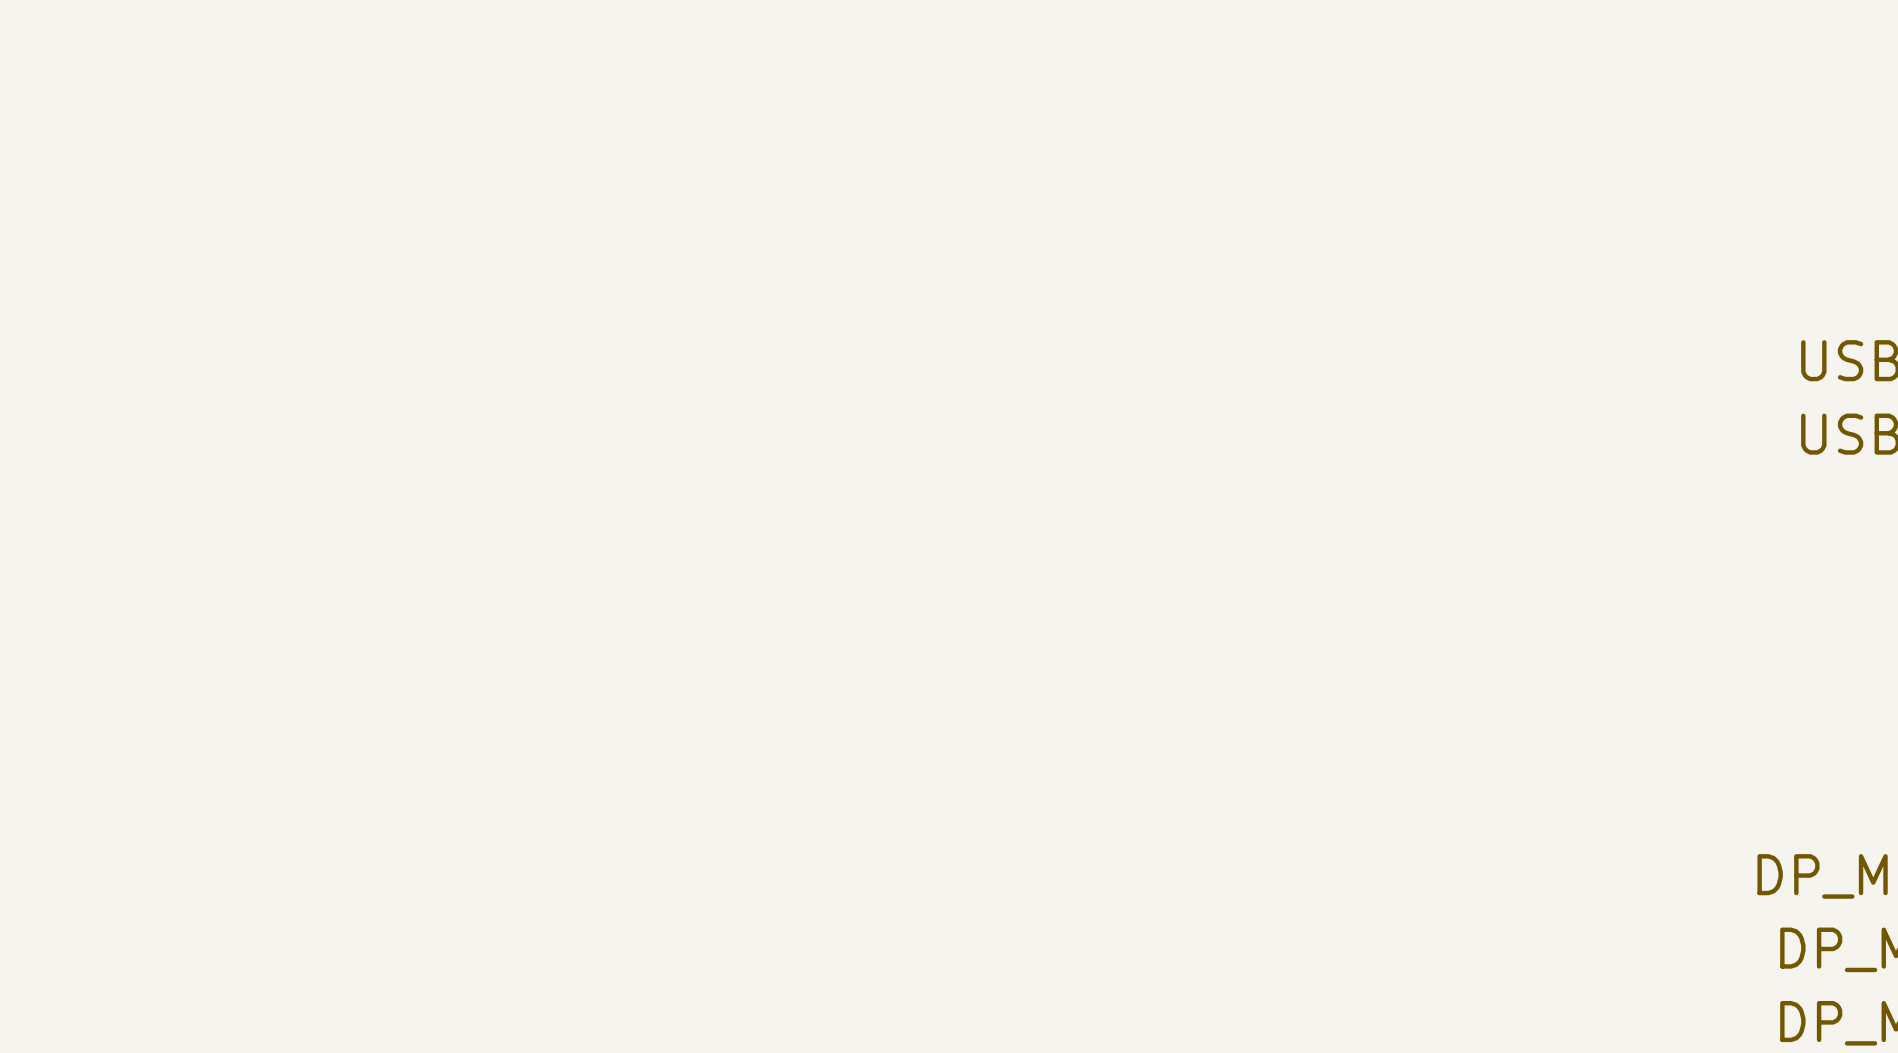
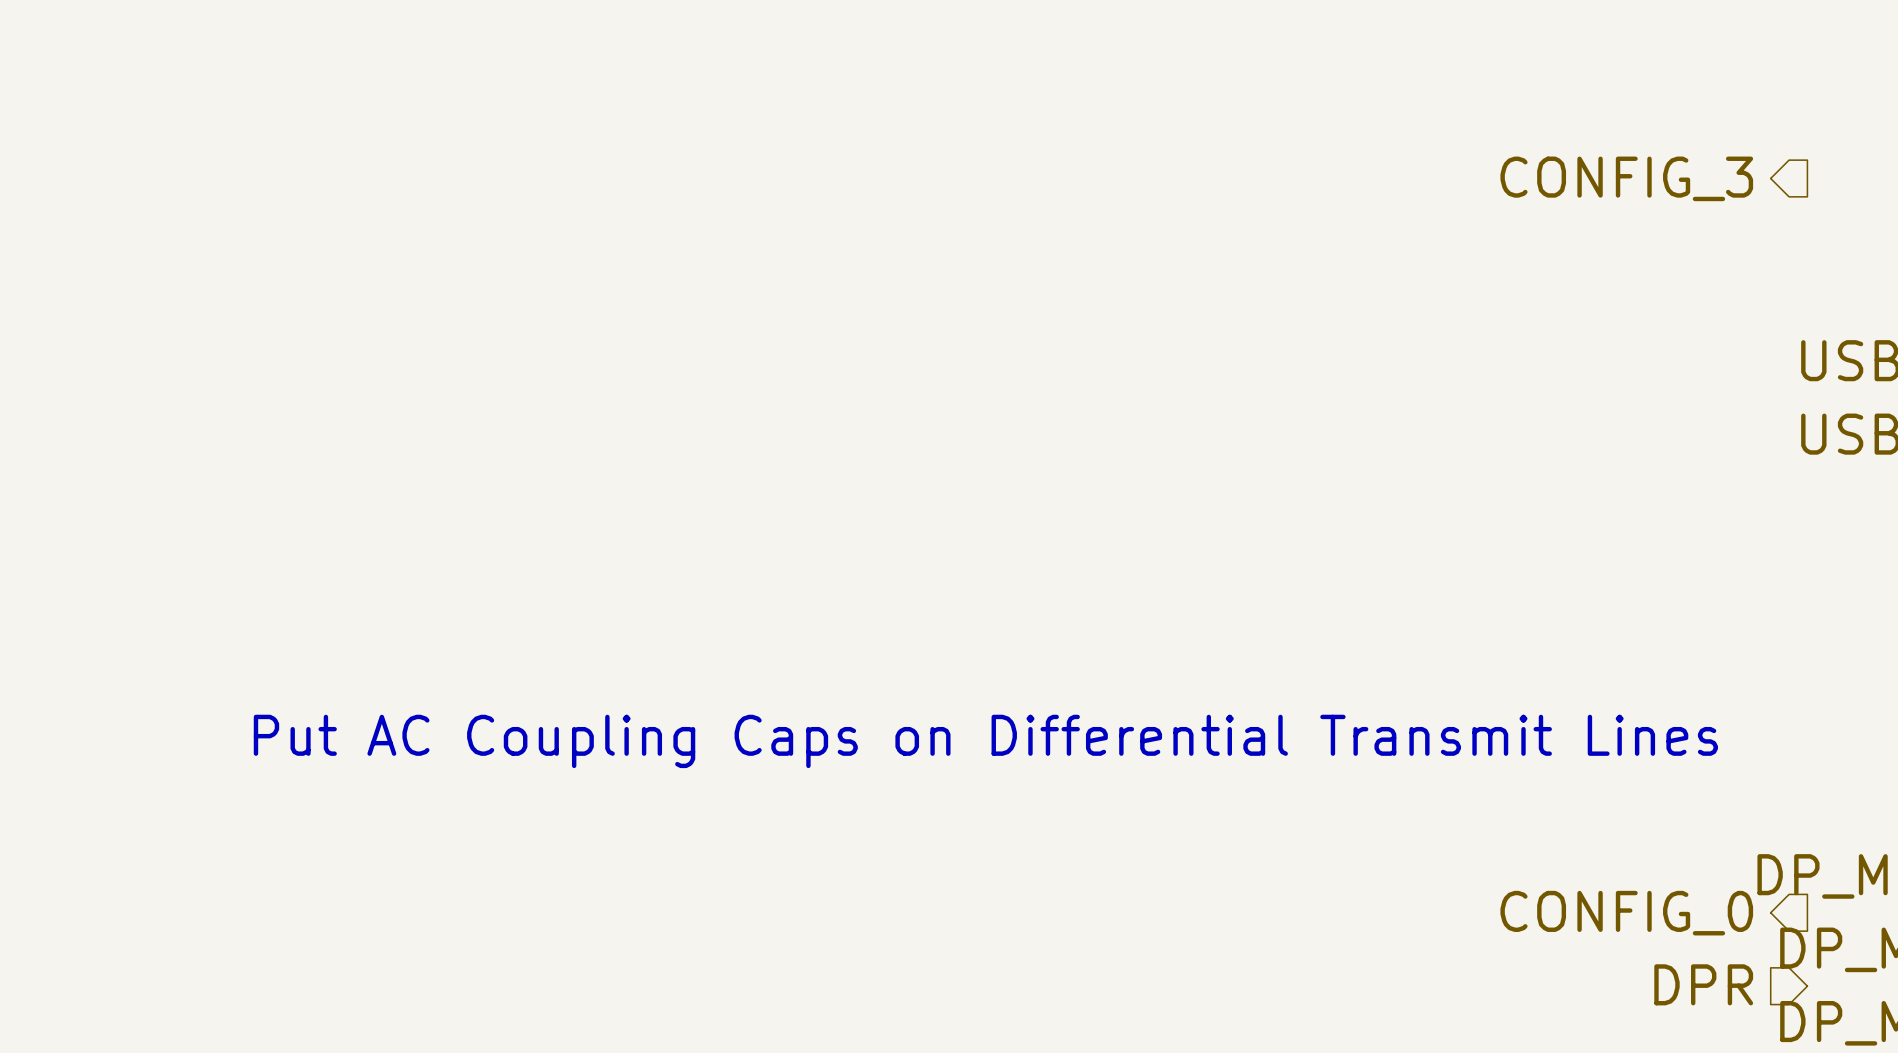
hierarchical label: none -> CONFIG_3 (1626, 178)
text: none -> Put AC Coupling Caps on Differential Transmit Lines (985, 741)
hierarchical label: none -> CONFIG_0 (1626, 913)
hierarchical label: none -> DPR (1703, 984)

